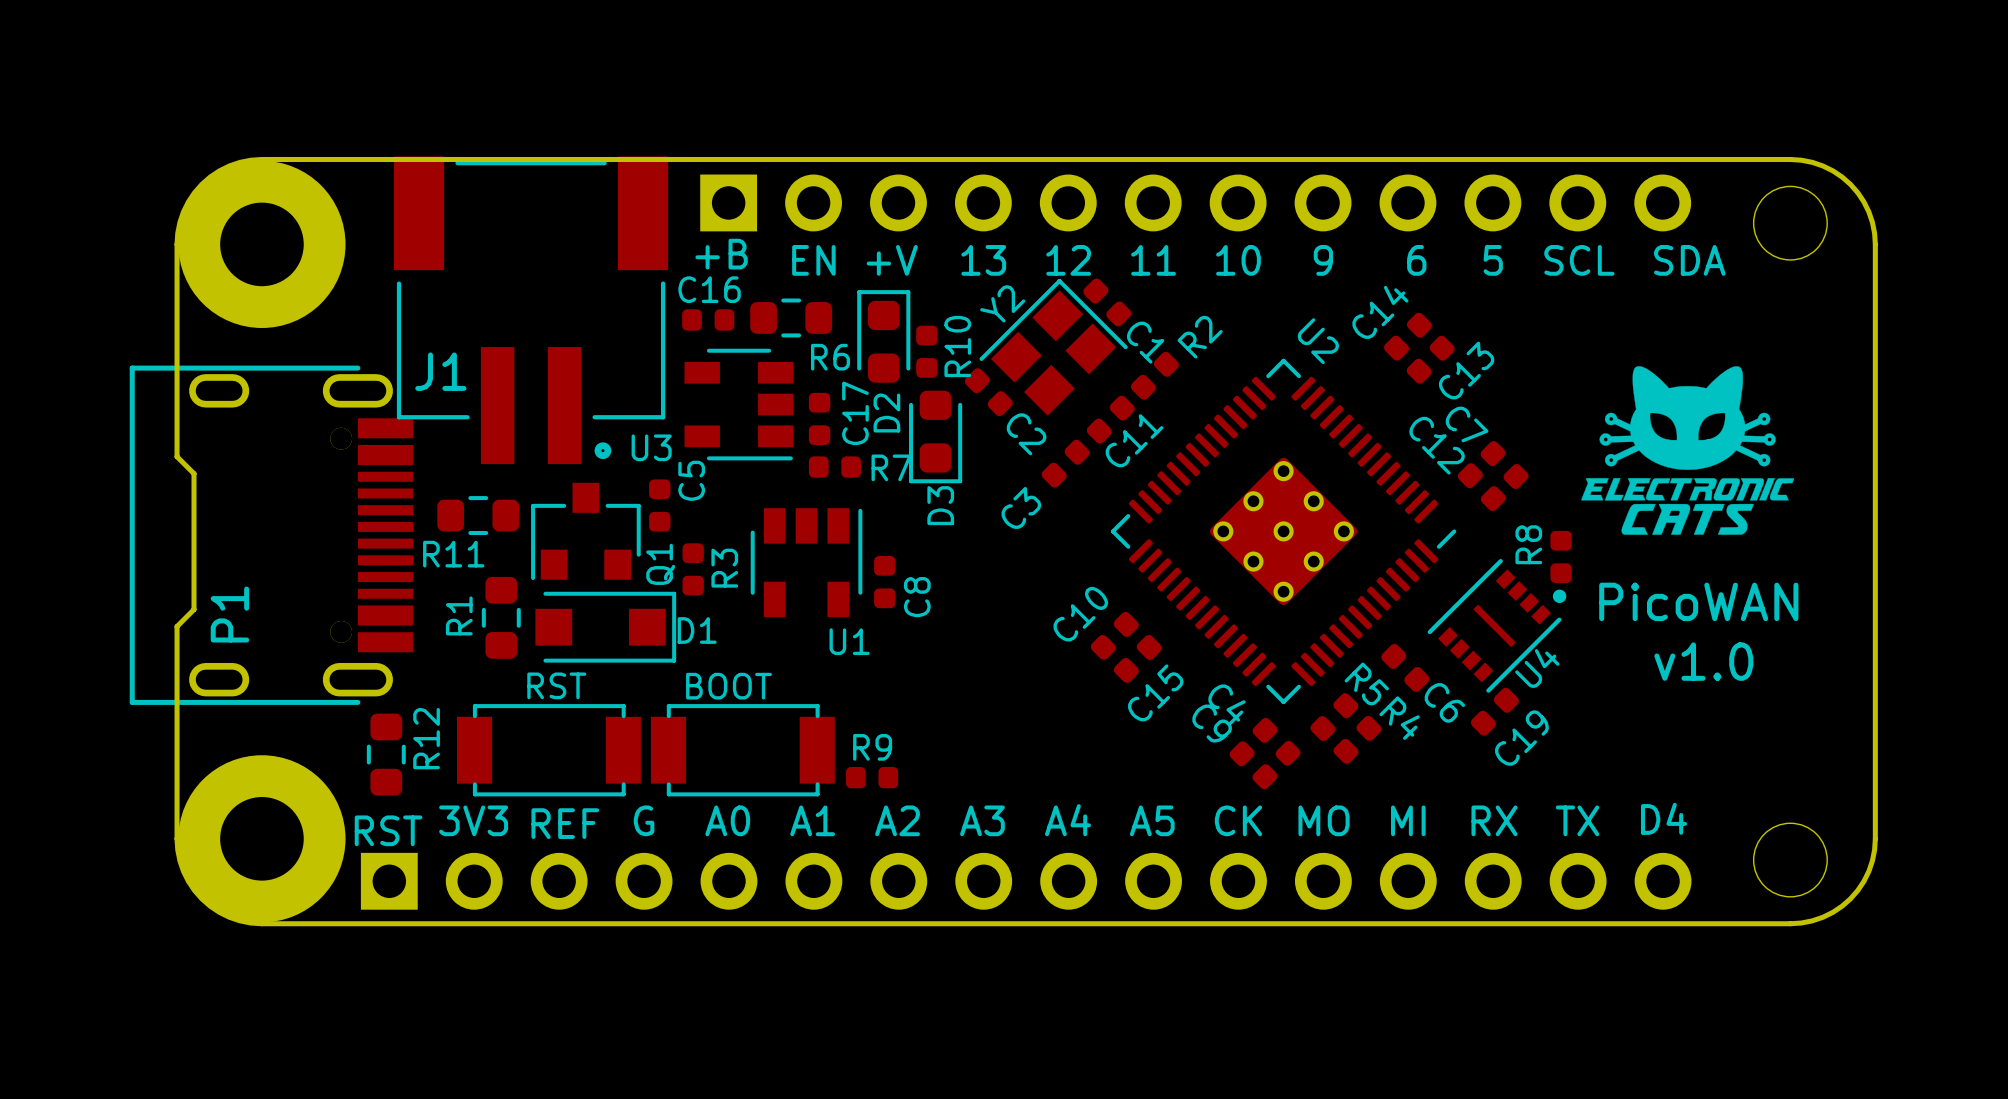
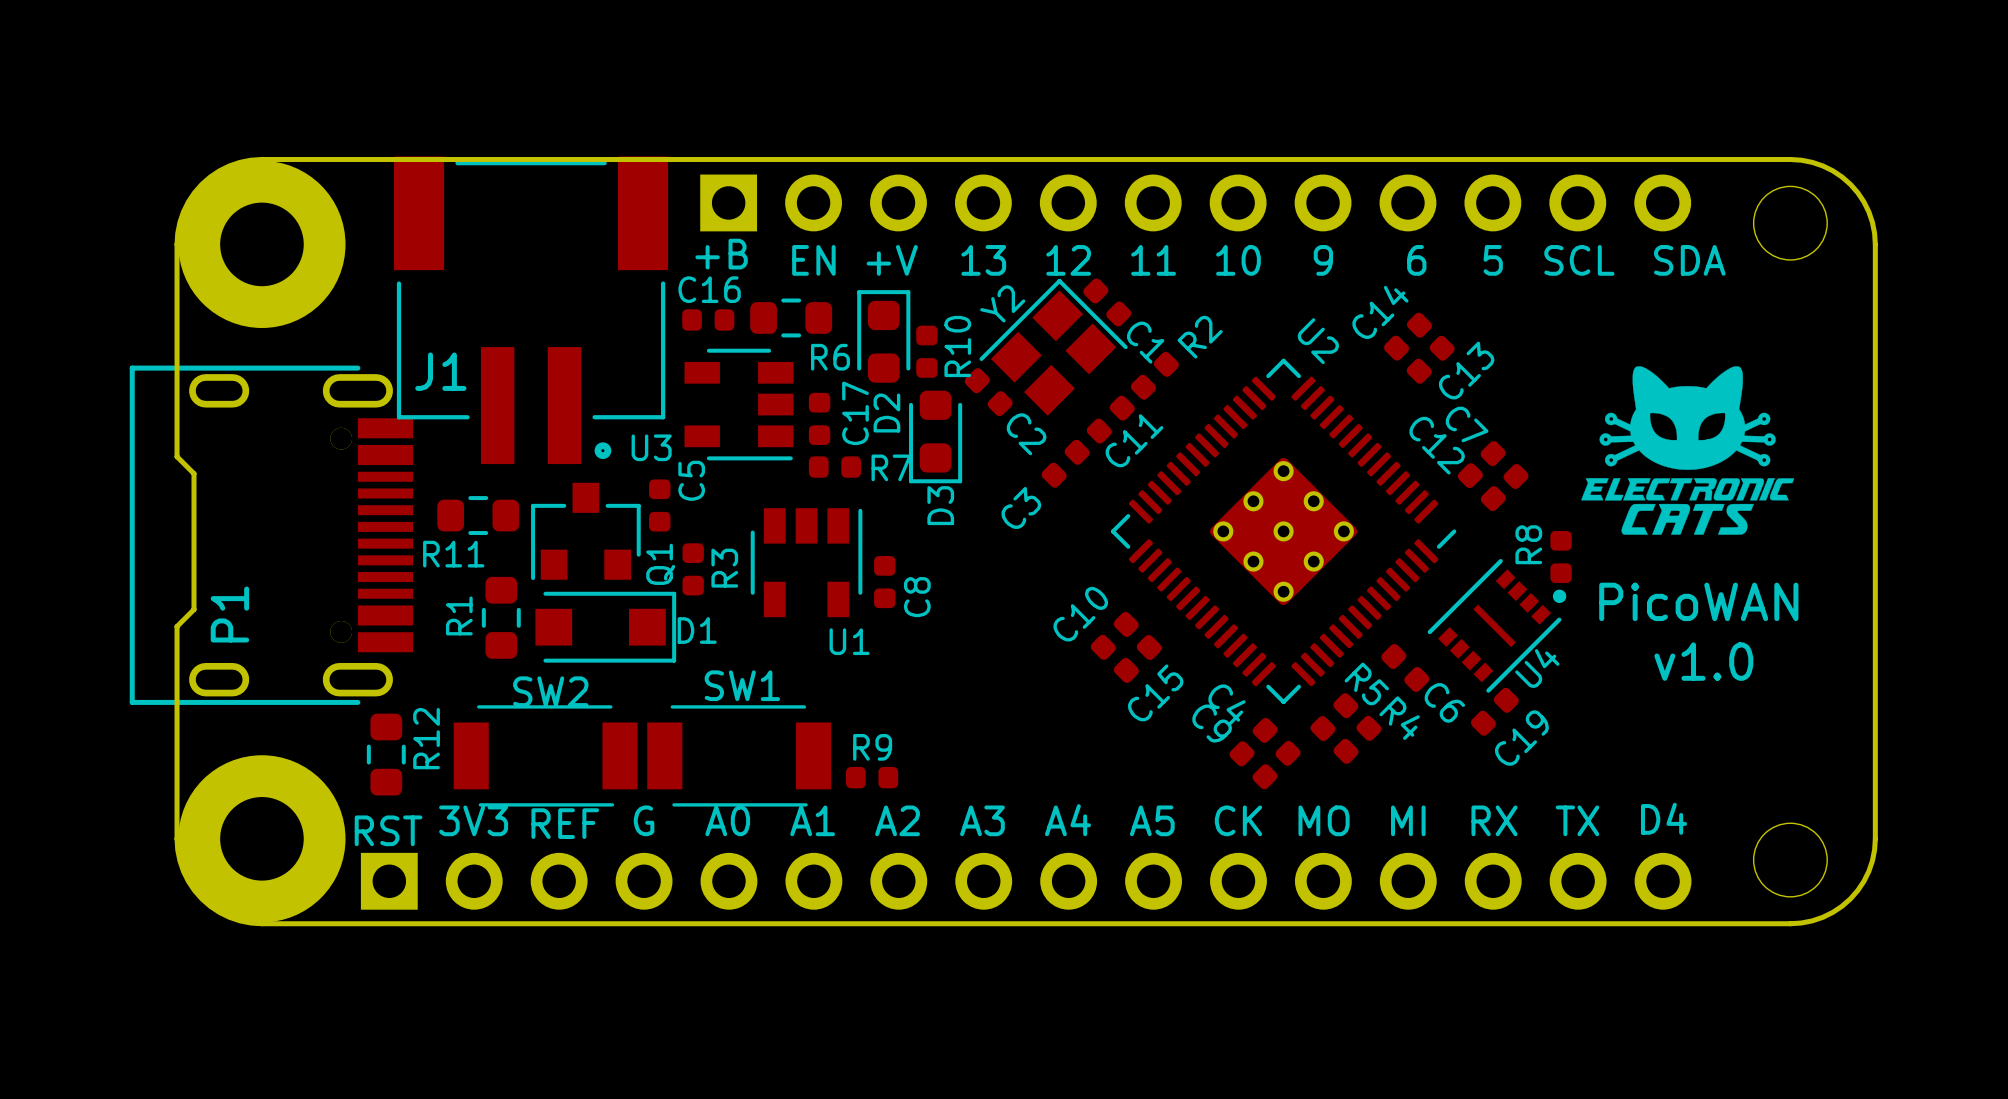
RST: (548, 750) -> none
BOOT: (742, 750) -> none
SW2: none -> (545, 755)
SW1: none -> (739, 755)

